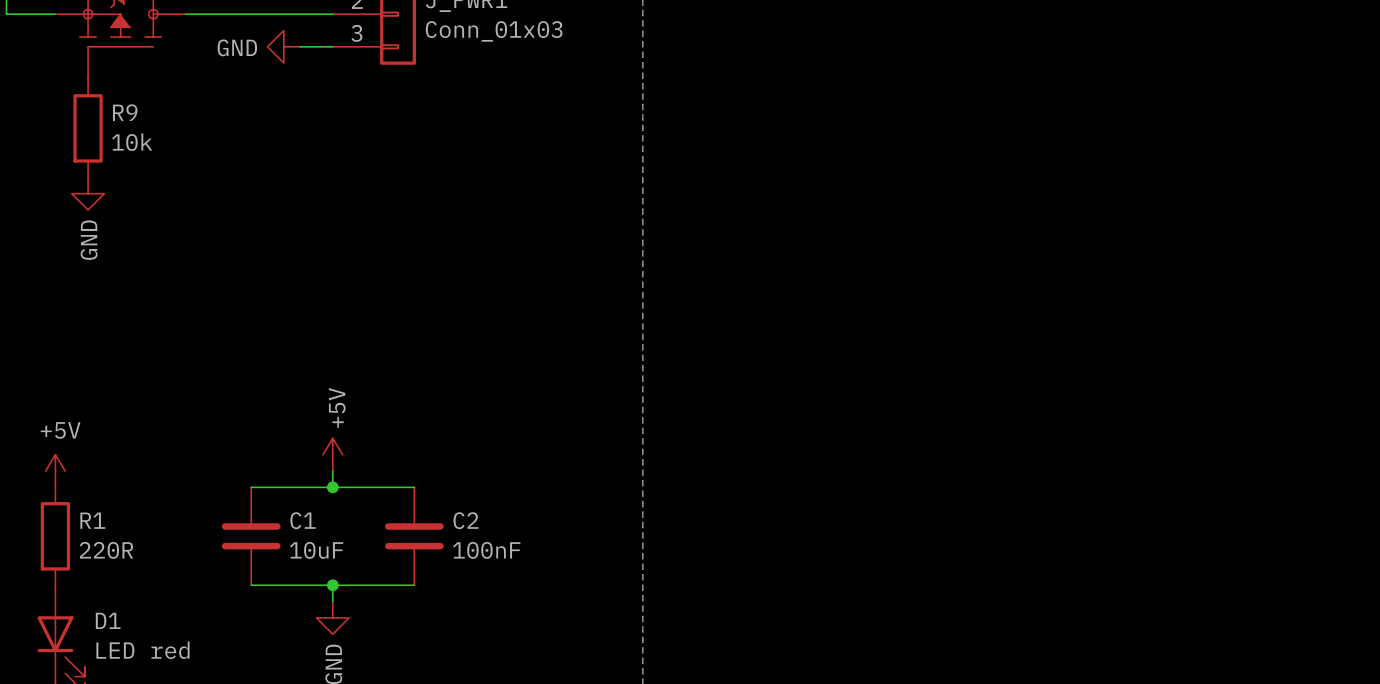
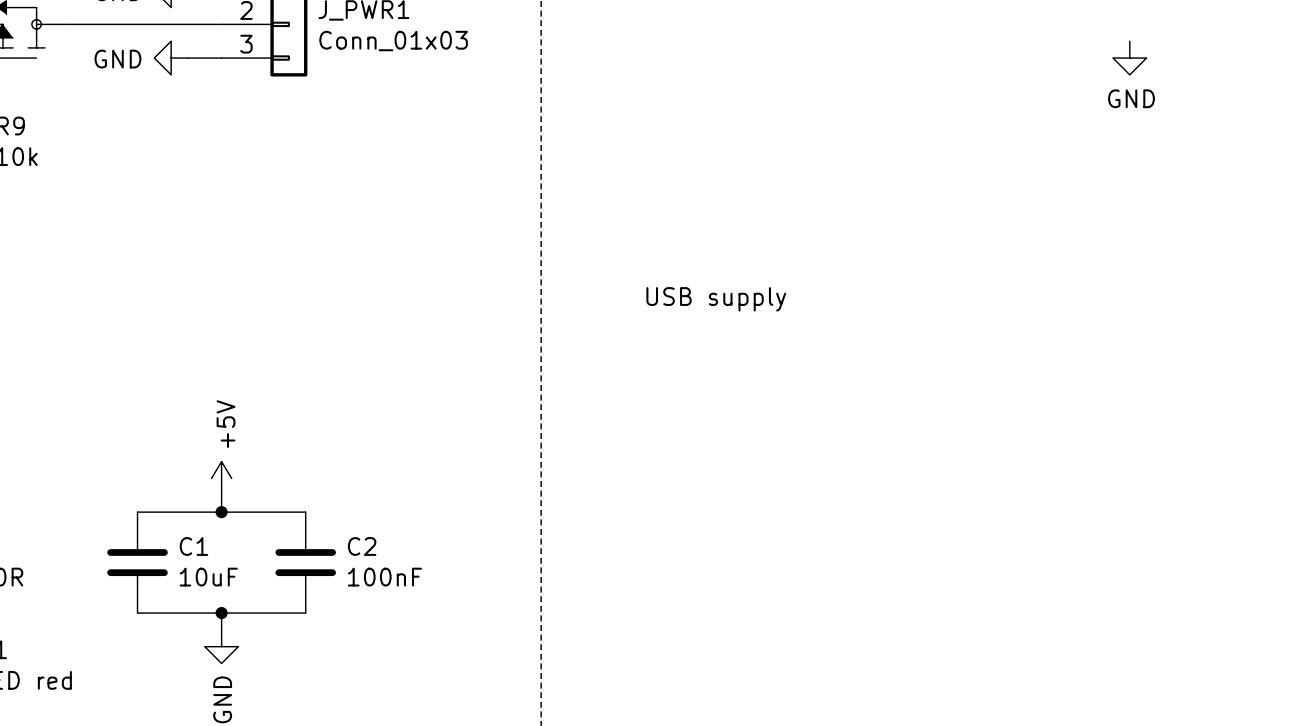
power symbol: none -> GND (1129, 58)
text: none -> USB supply (716, 299)

